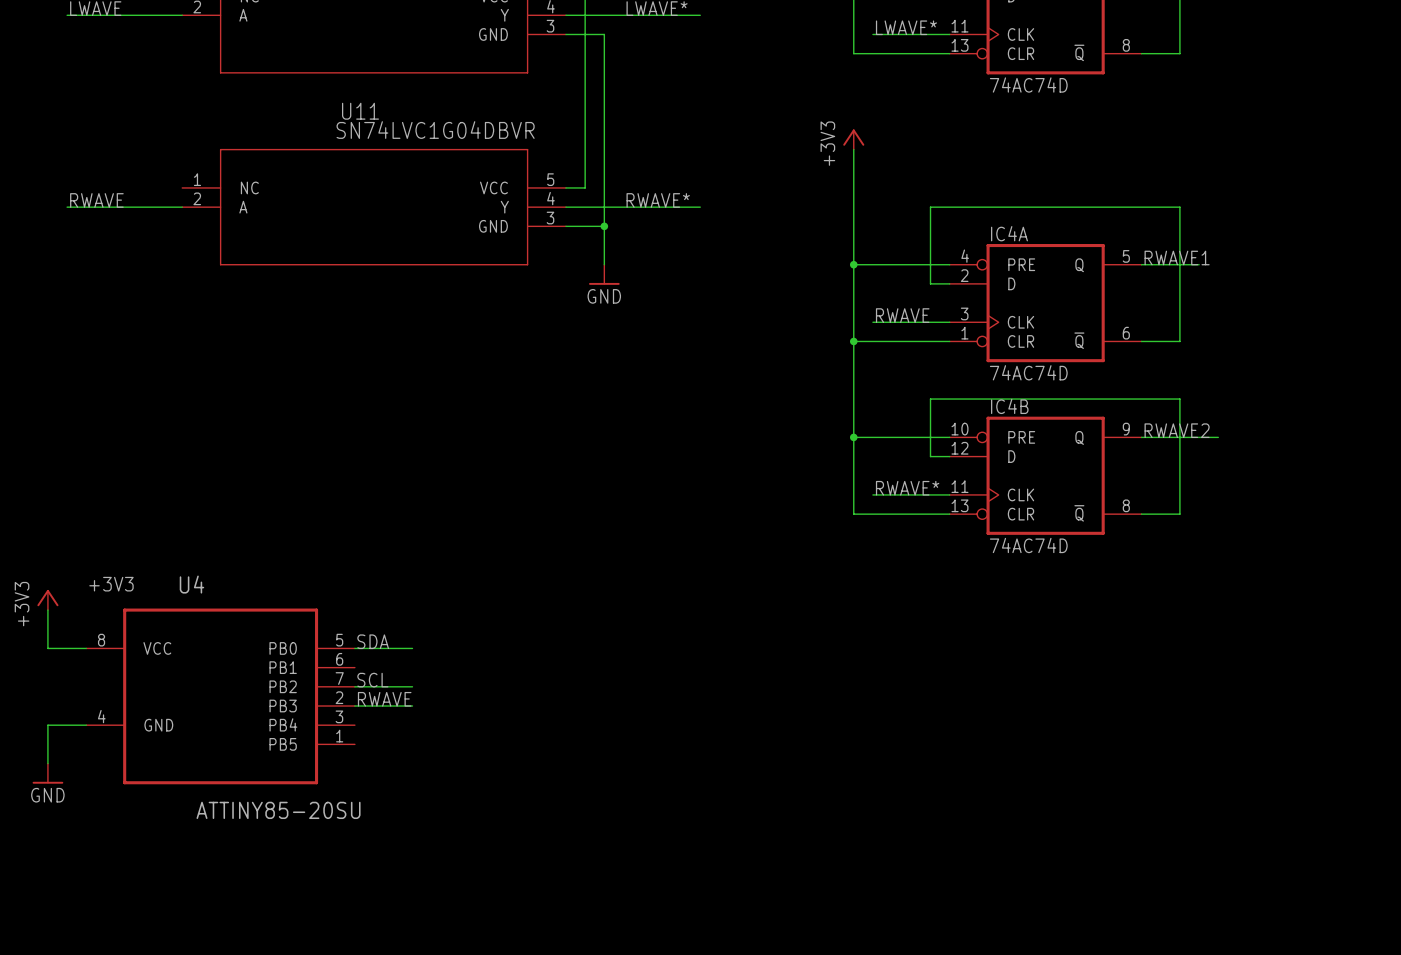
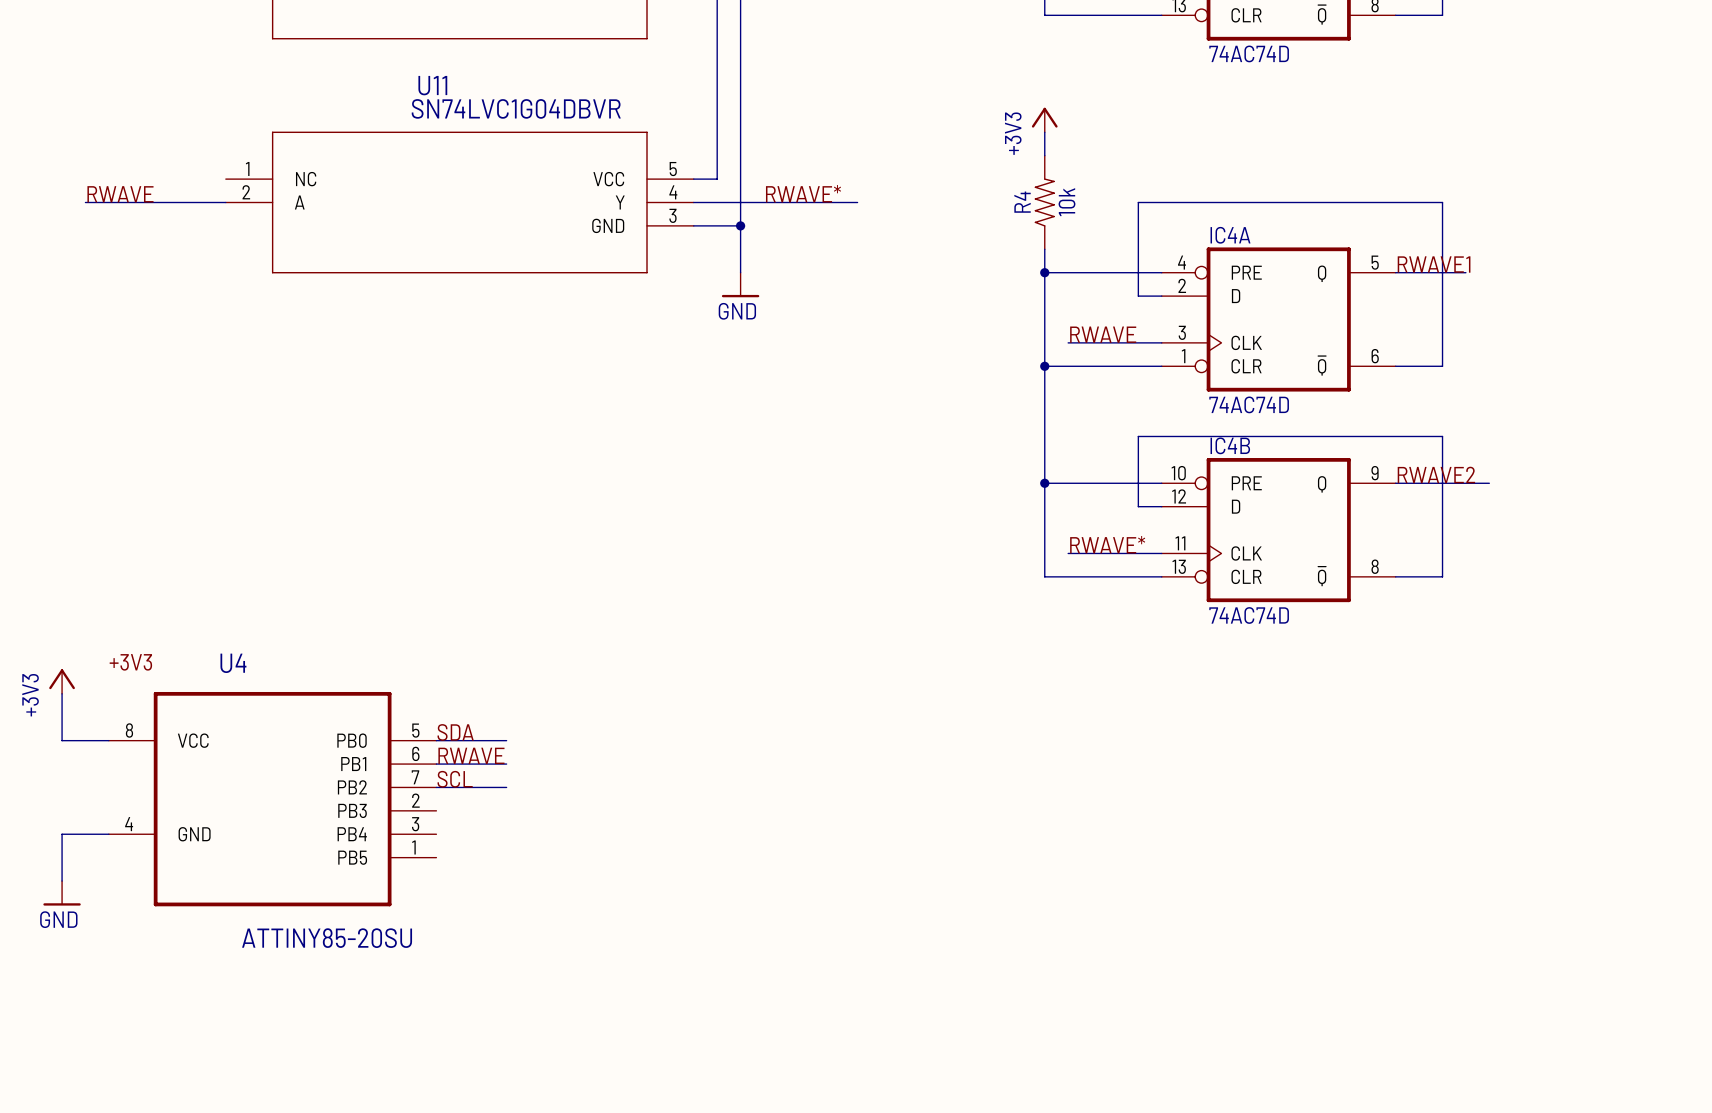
R4: none -> 10k (1044, 202)
label position: RWAVE (384, 699) -> RWAVE (471, 755)
wire: (354, 706) (412, 706) -> (436, 764) (506, 764)

